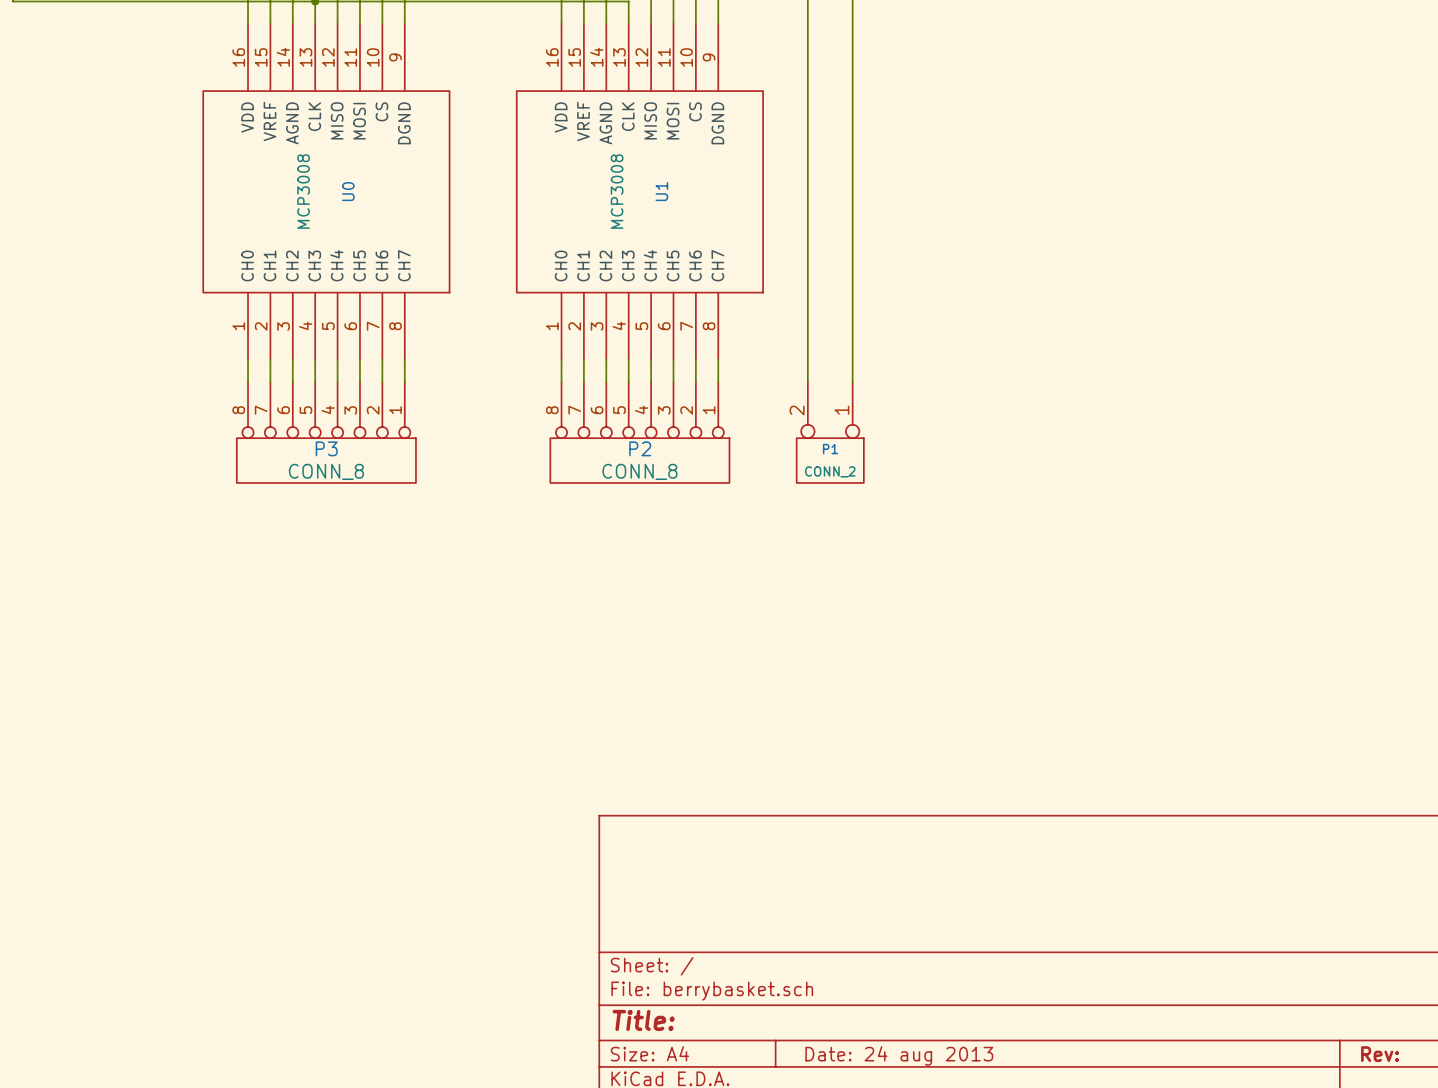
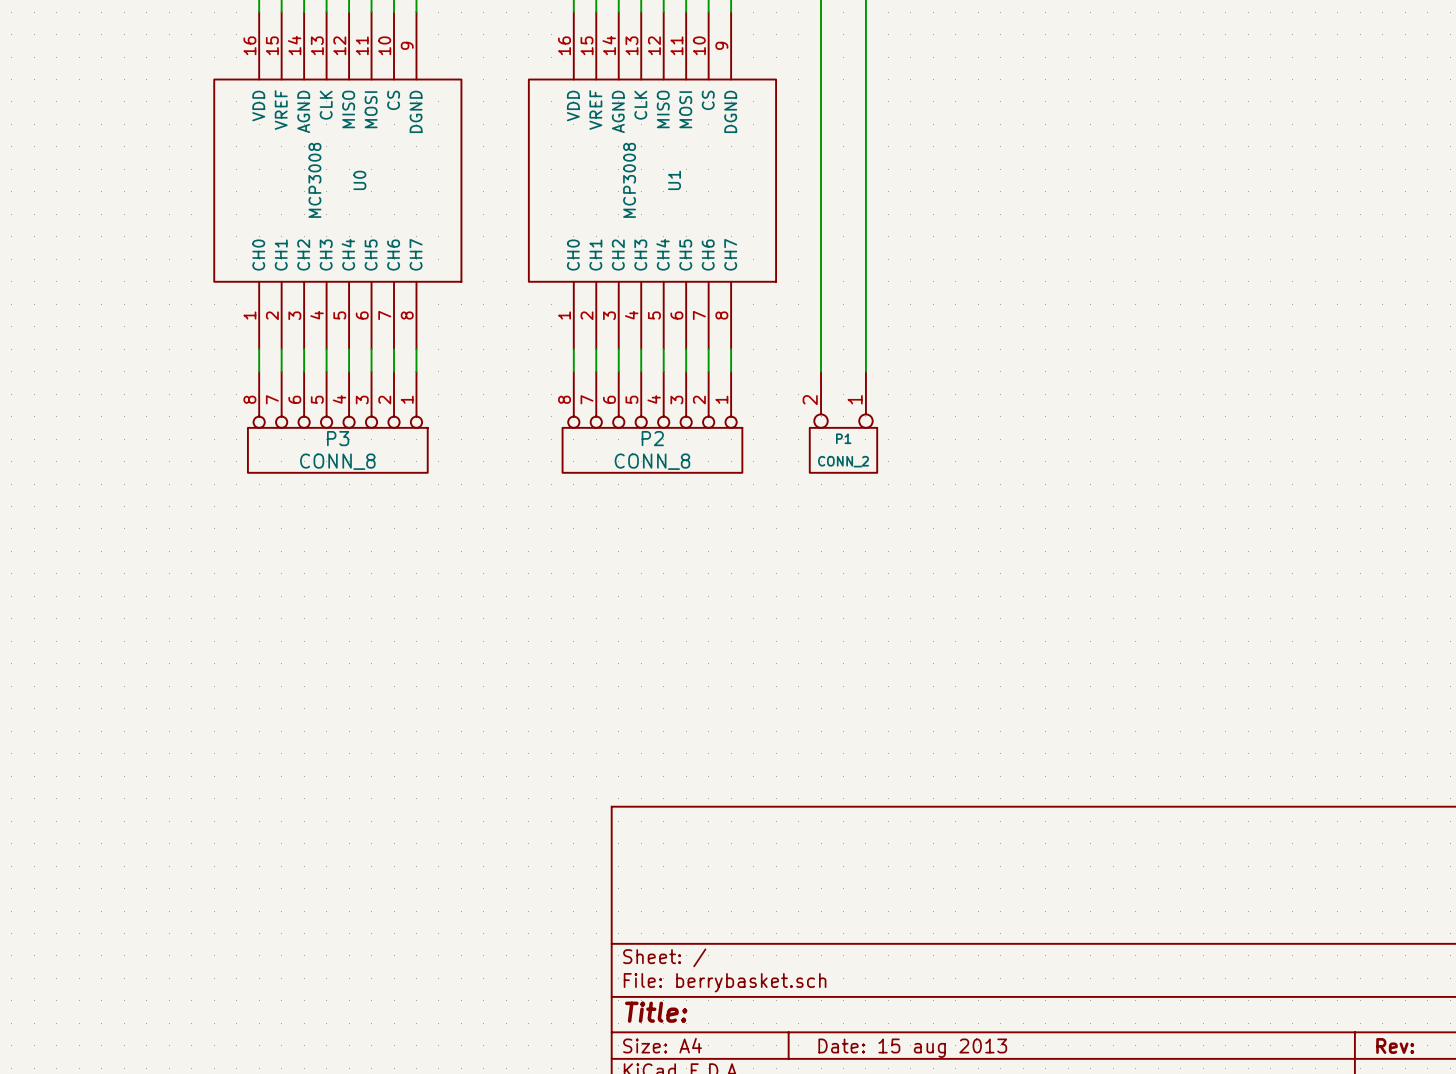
title block: Date: 24 aug 2013 (899, 1056) -> Date: 15 aug 2013 (912, 1048)

